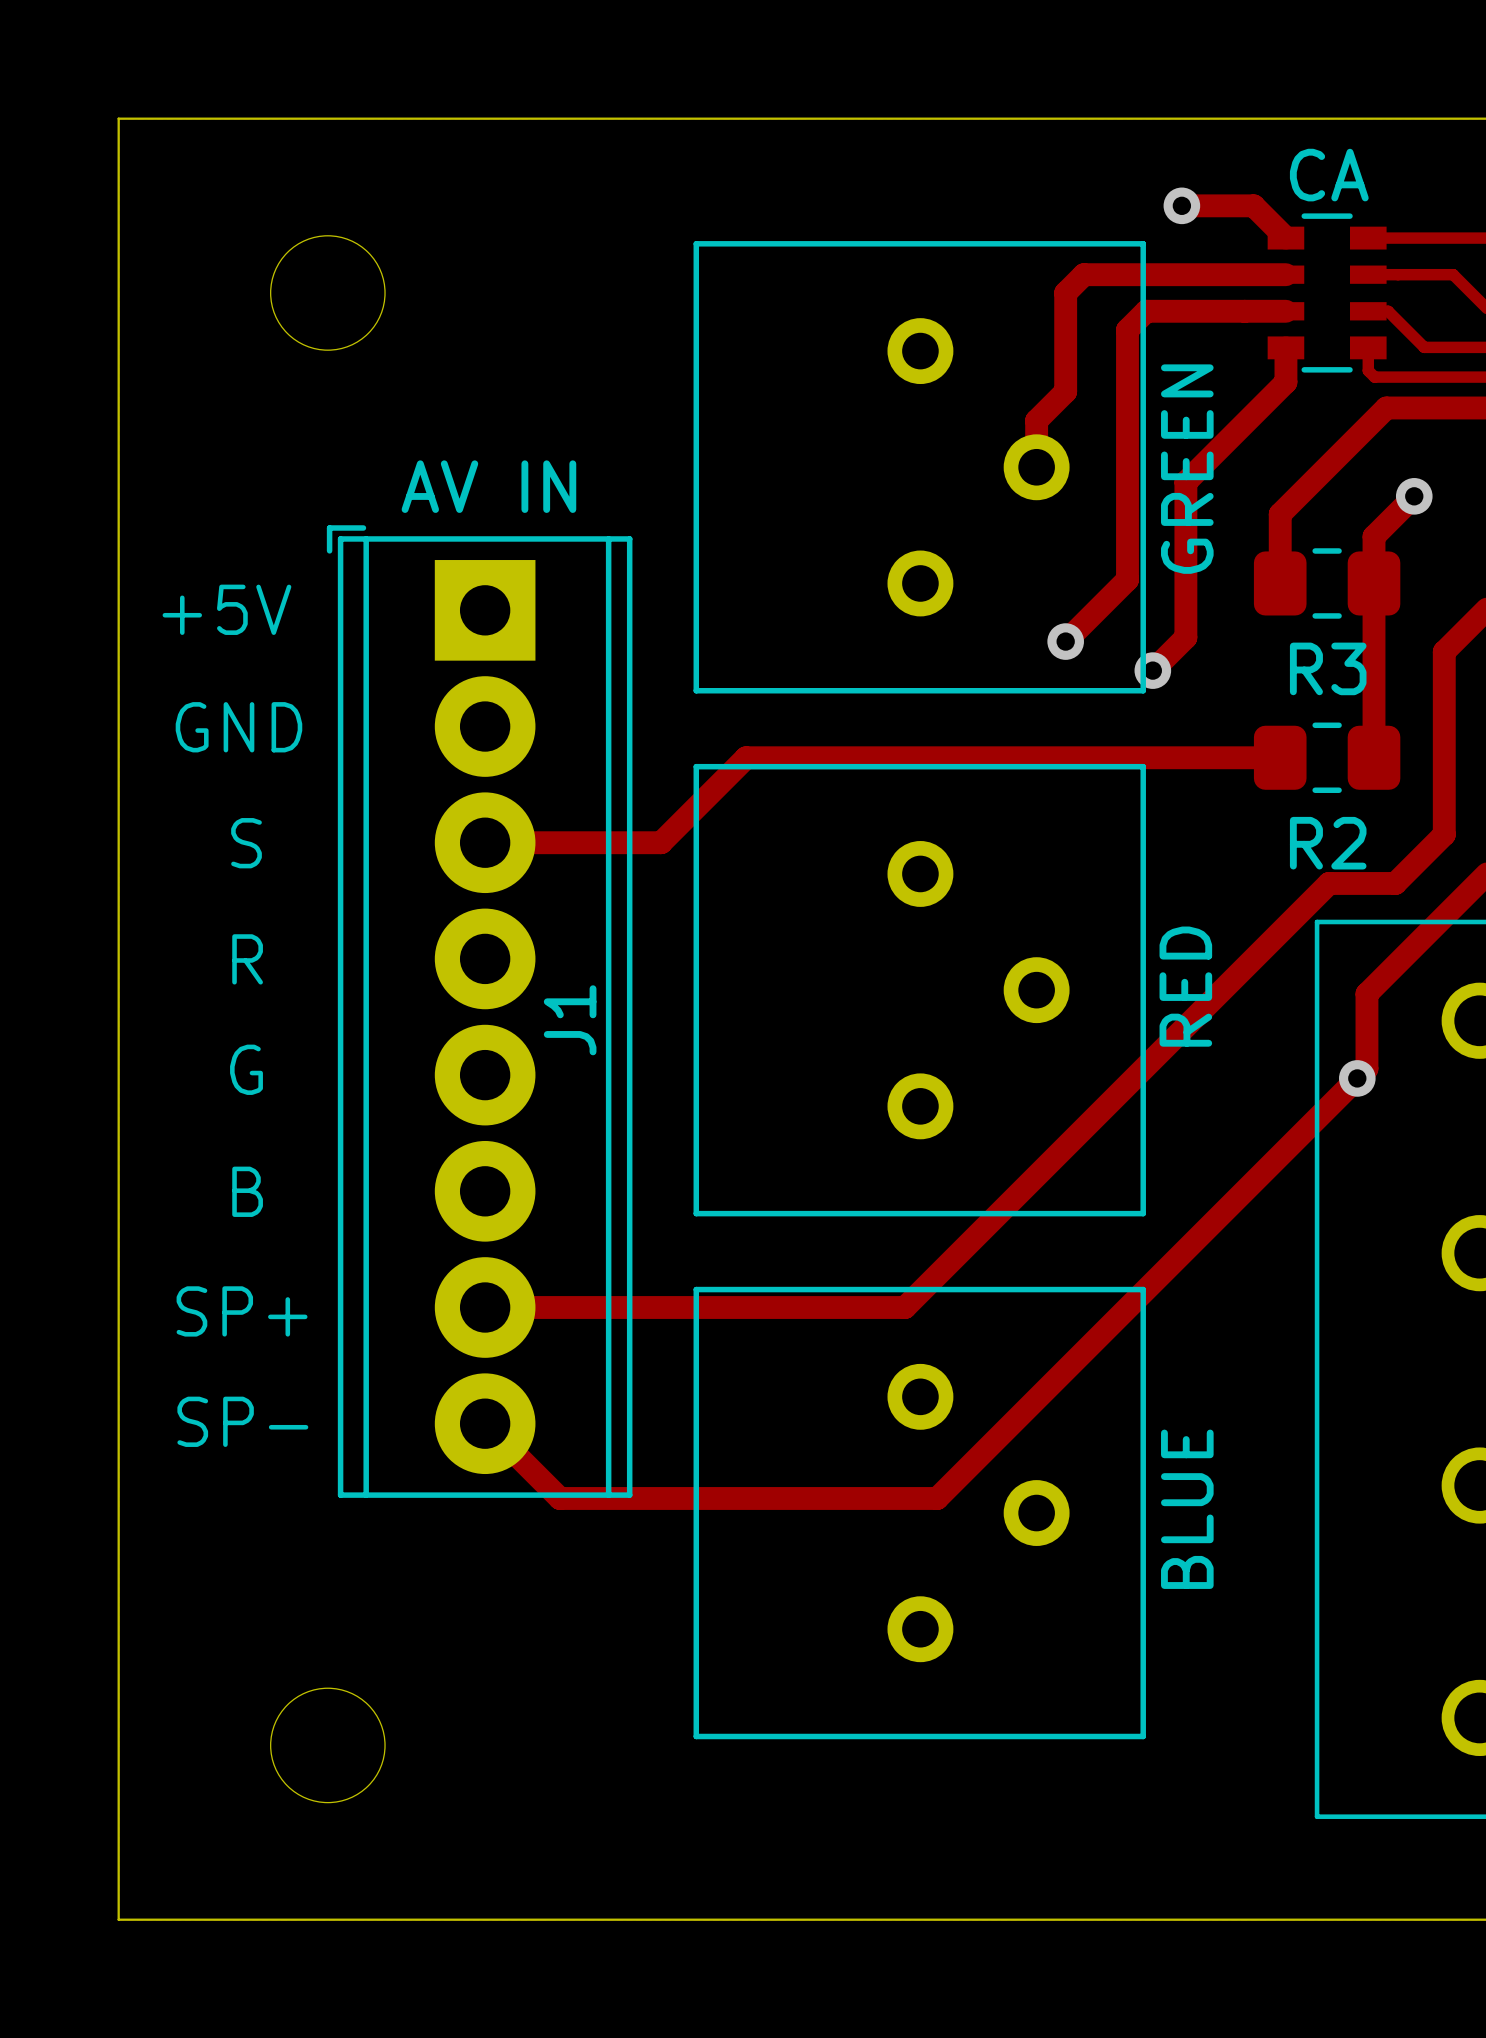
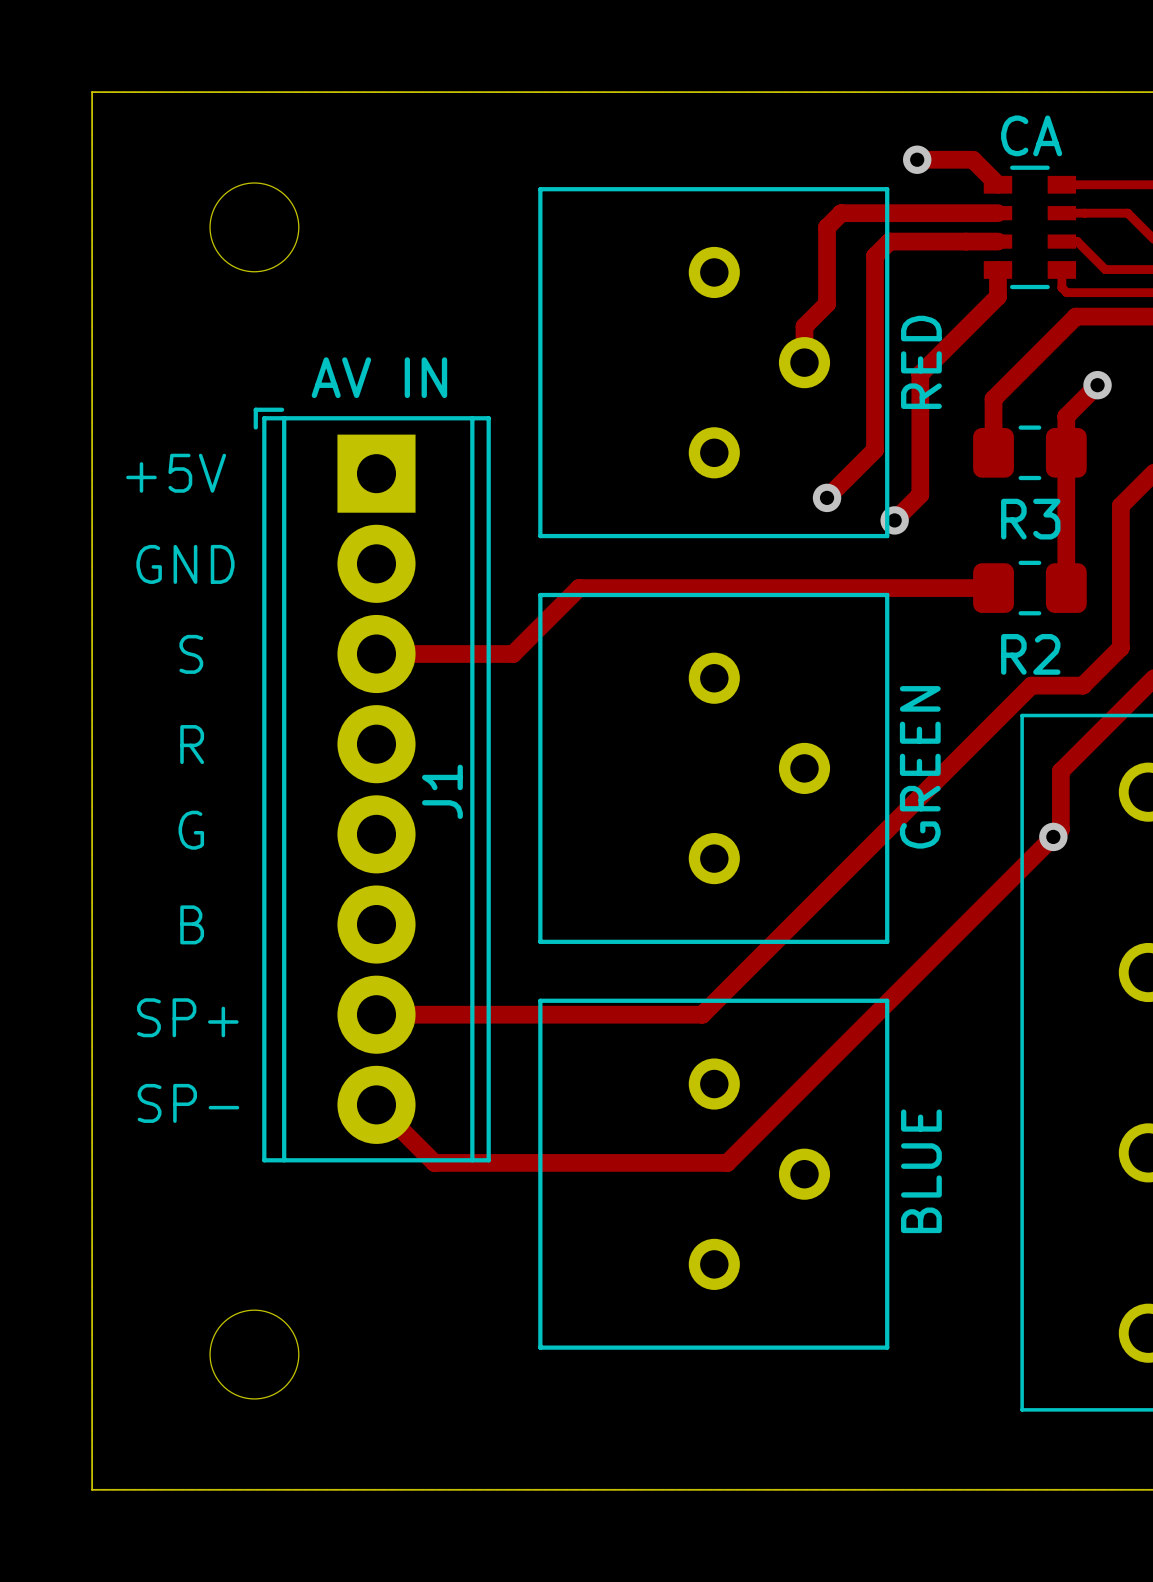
GREEN name: GREEN (1187, 469) -> RED (921, 362)
RED name: RED (1185, 986) -> GREEN (920, 767)

